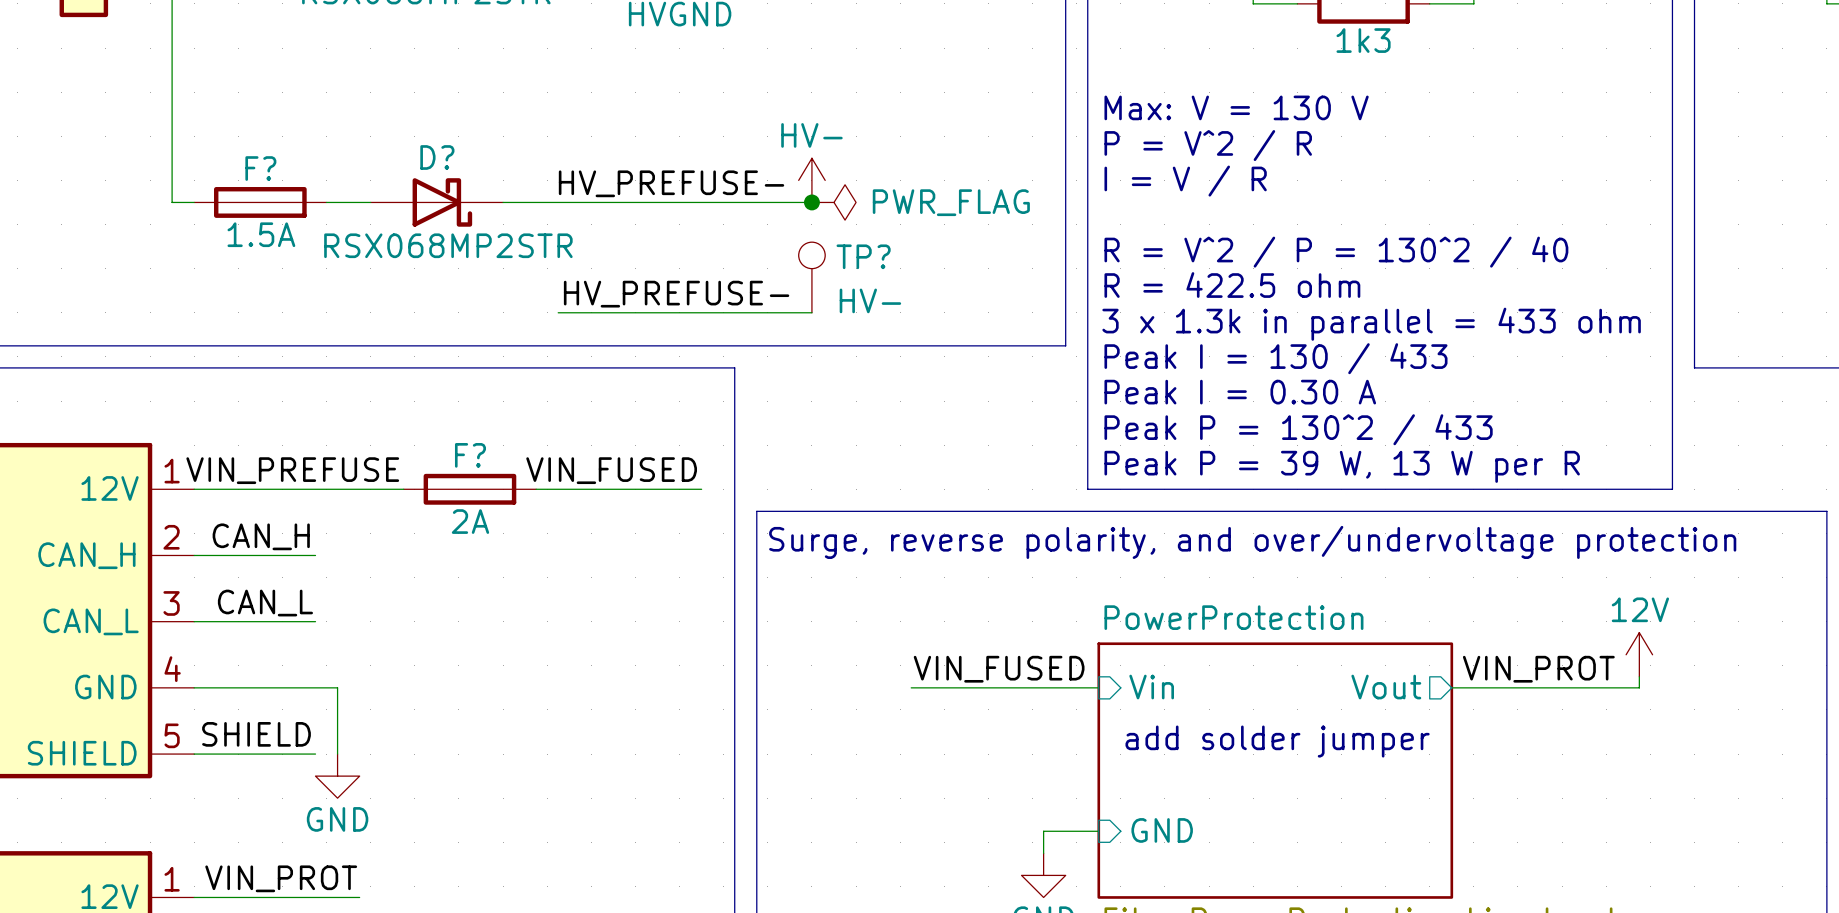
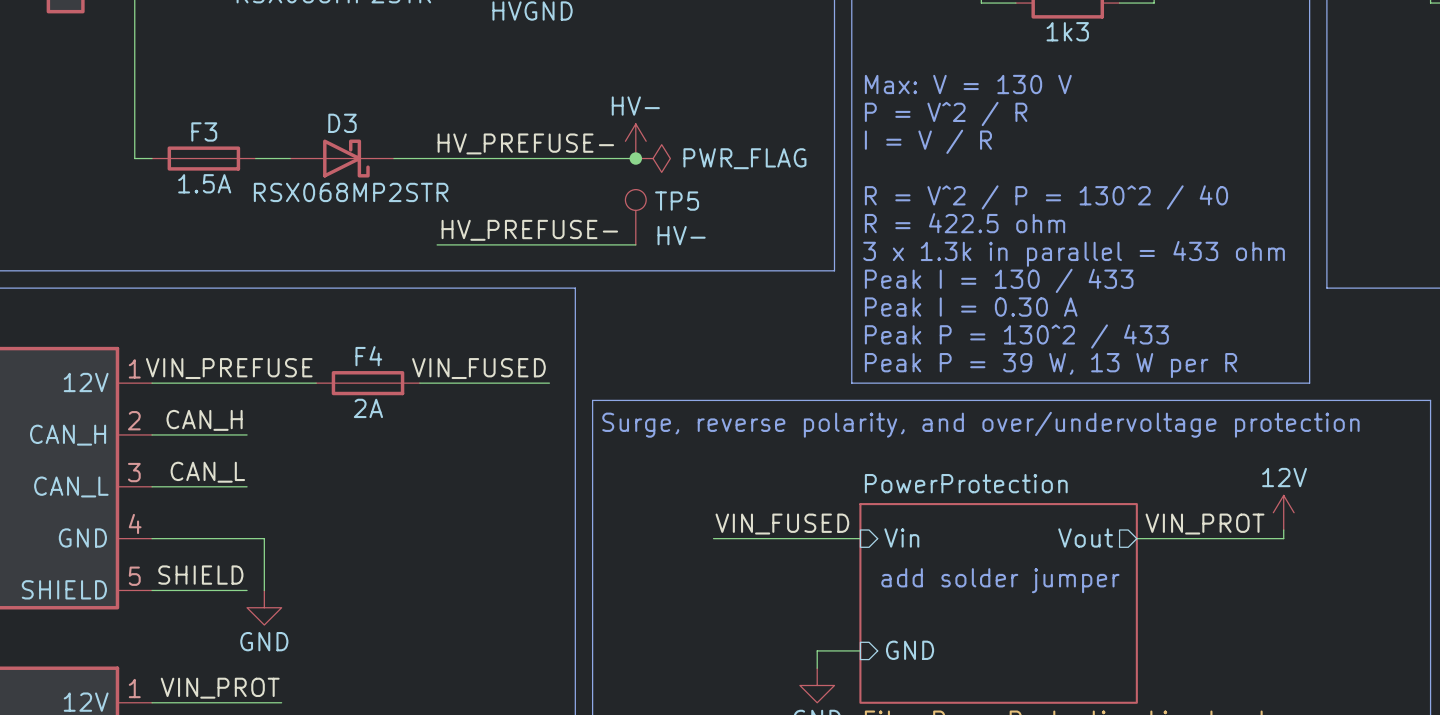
D? name: D? (437, 157) -> D3 (342, 123)
F? name: F? (260, 168) -> F3 (204, 131)
TP? name: TP? (863, 256) -> TP5 (677, 201)
F? name: F? (470, 455) -> F4 (368, 356)

